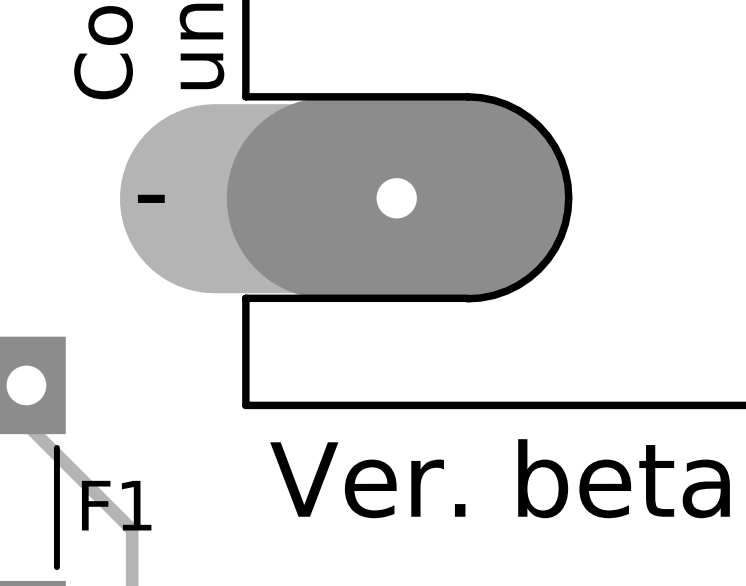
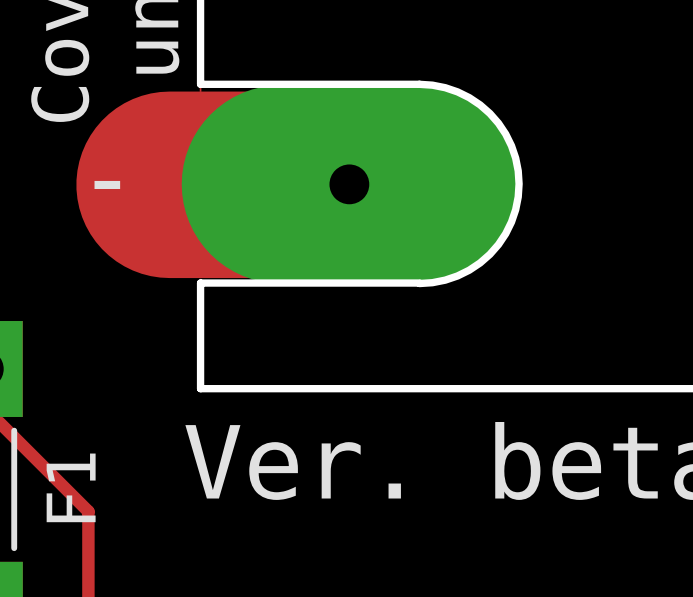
F1 name rotation: 0° (116, 505) -> 90° counterclockwise (71, 487)

